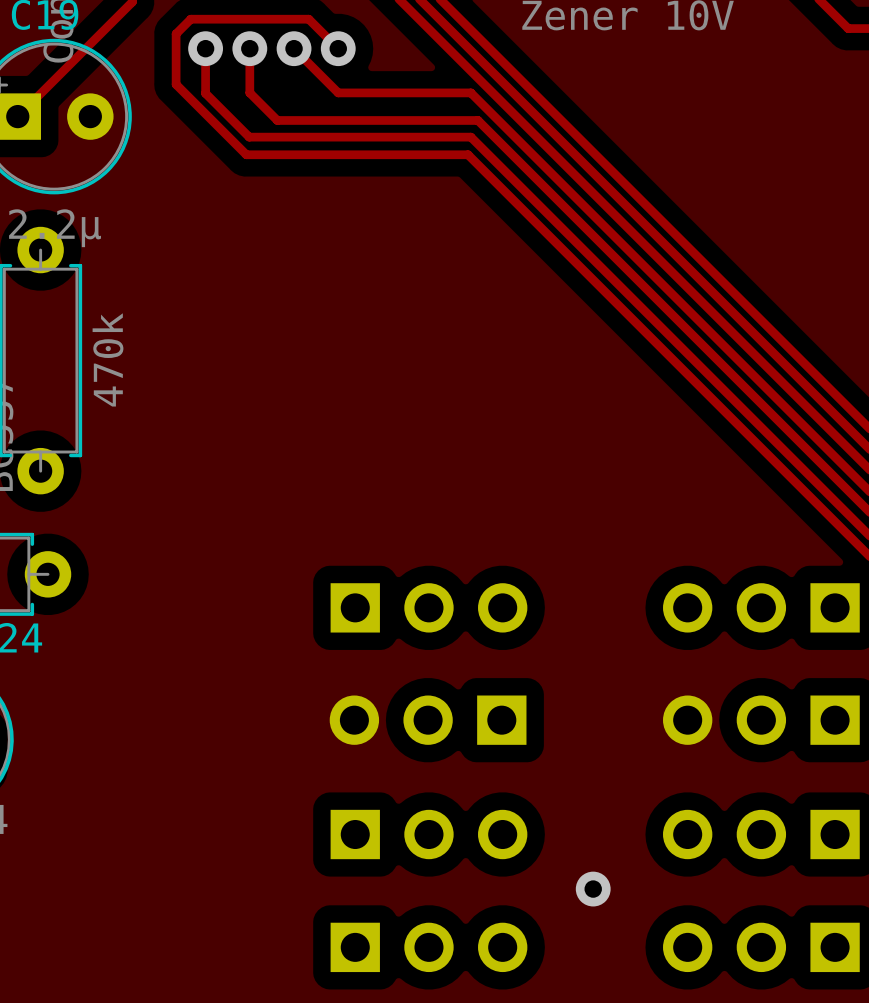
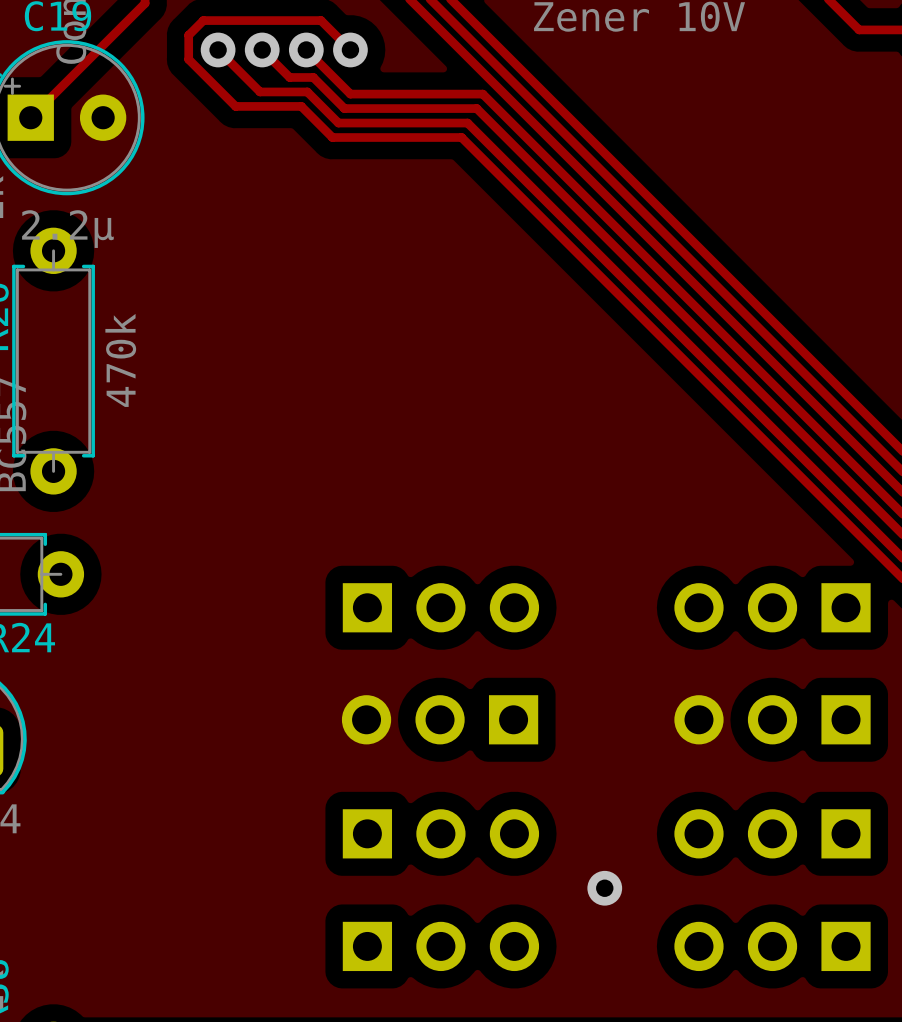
track: (205, 48) (205, 93) (249, 137) (470, 137) -> (218, 49) (260, 91) (307, 91) (338, 123) (467, 123) (482, 138)
track: (249, 48) (249, 92) (277, 120) (477, 120) -> (262, 49) (289, 77) (313, 77) (344, 108) (476, 108) (489, 121)
track: (176, 58) (176, 84) (246, 154) (468, 154) -> (188, 59) (235, 106) (301, 106) (332, 137) (461, 137) (479, 155)

